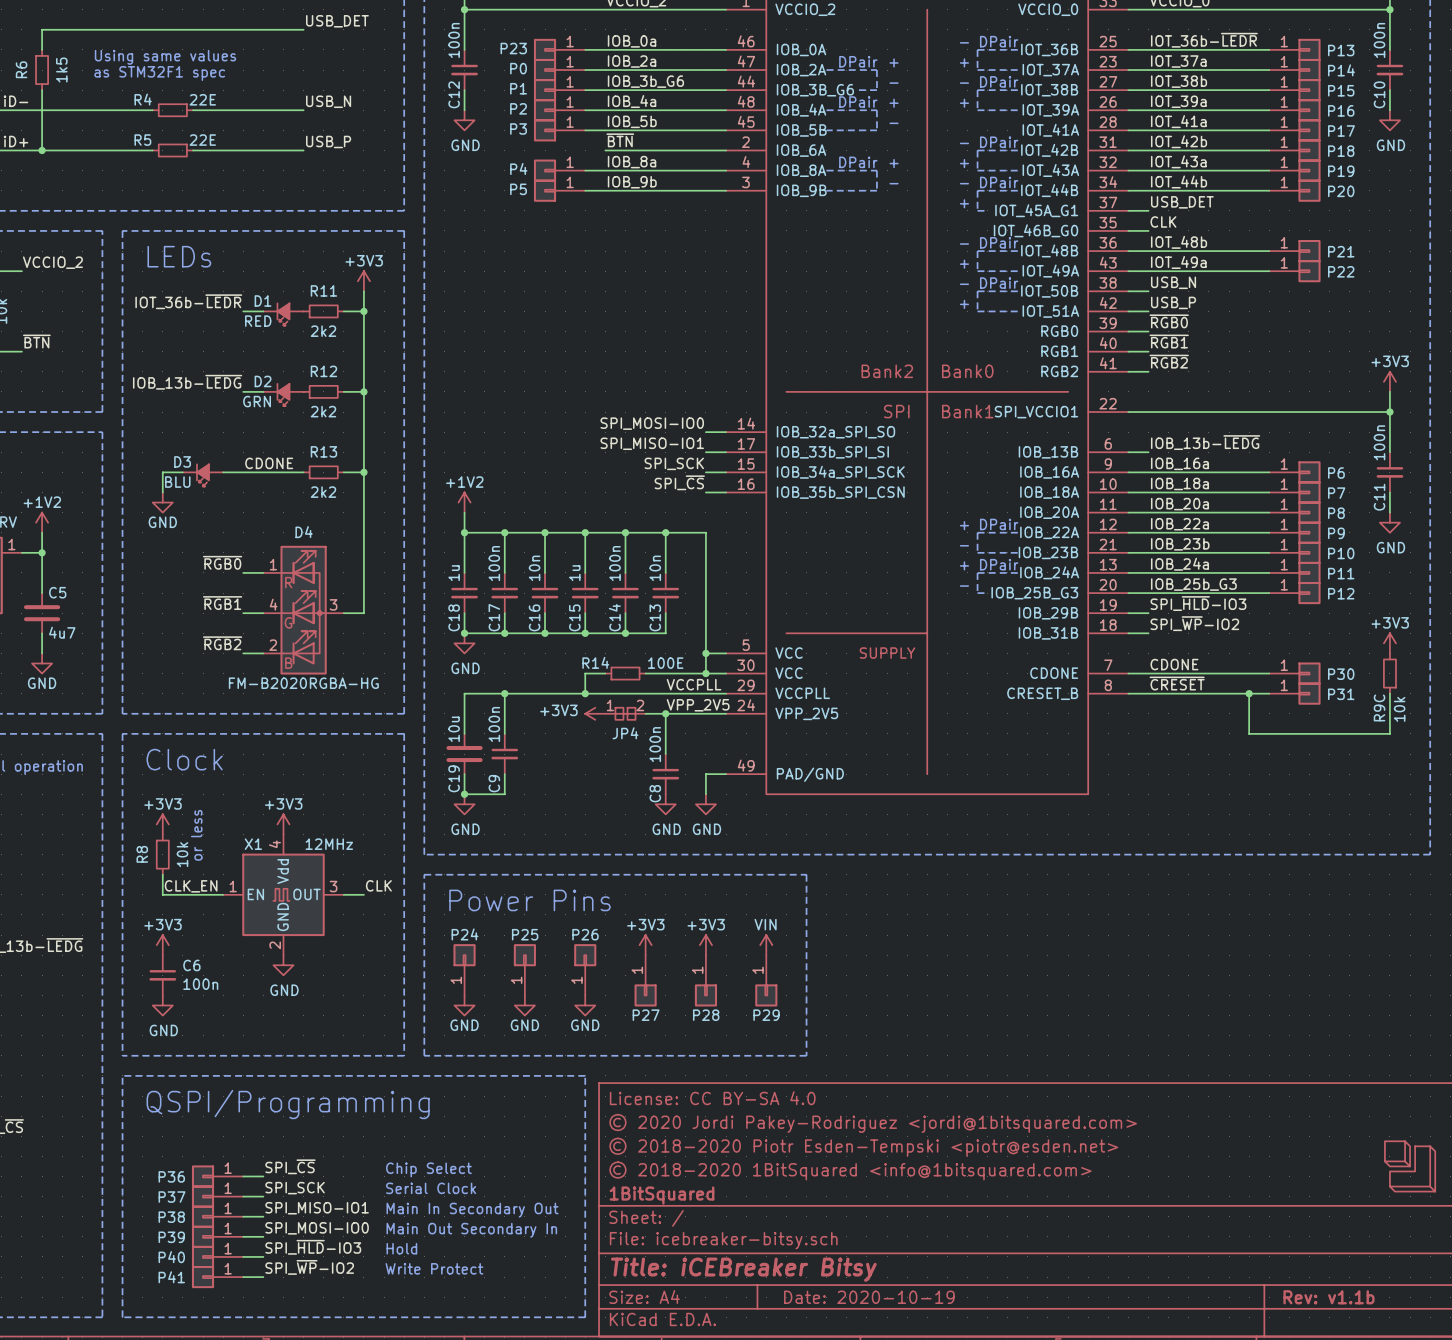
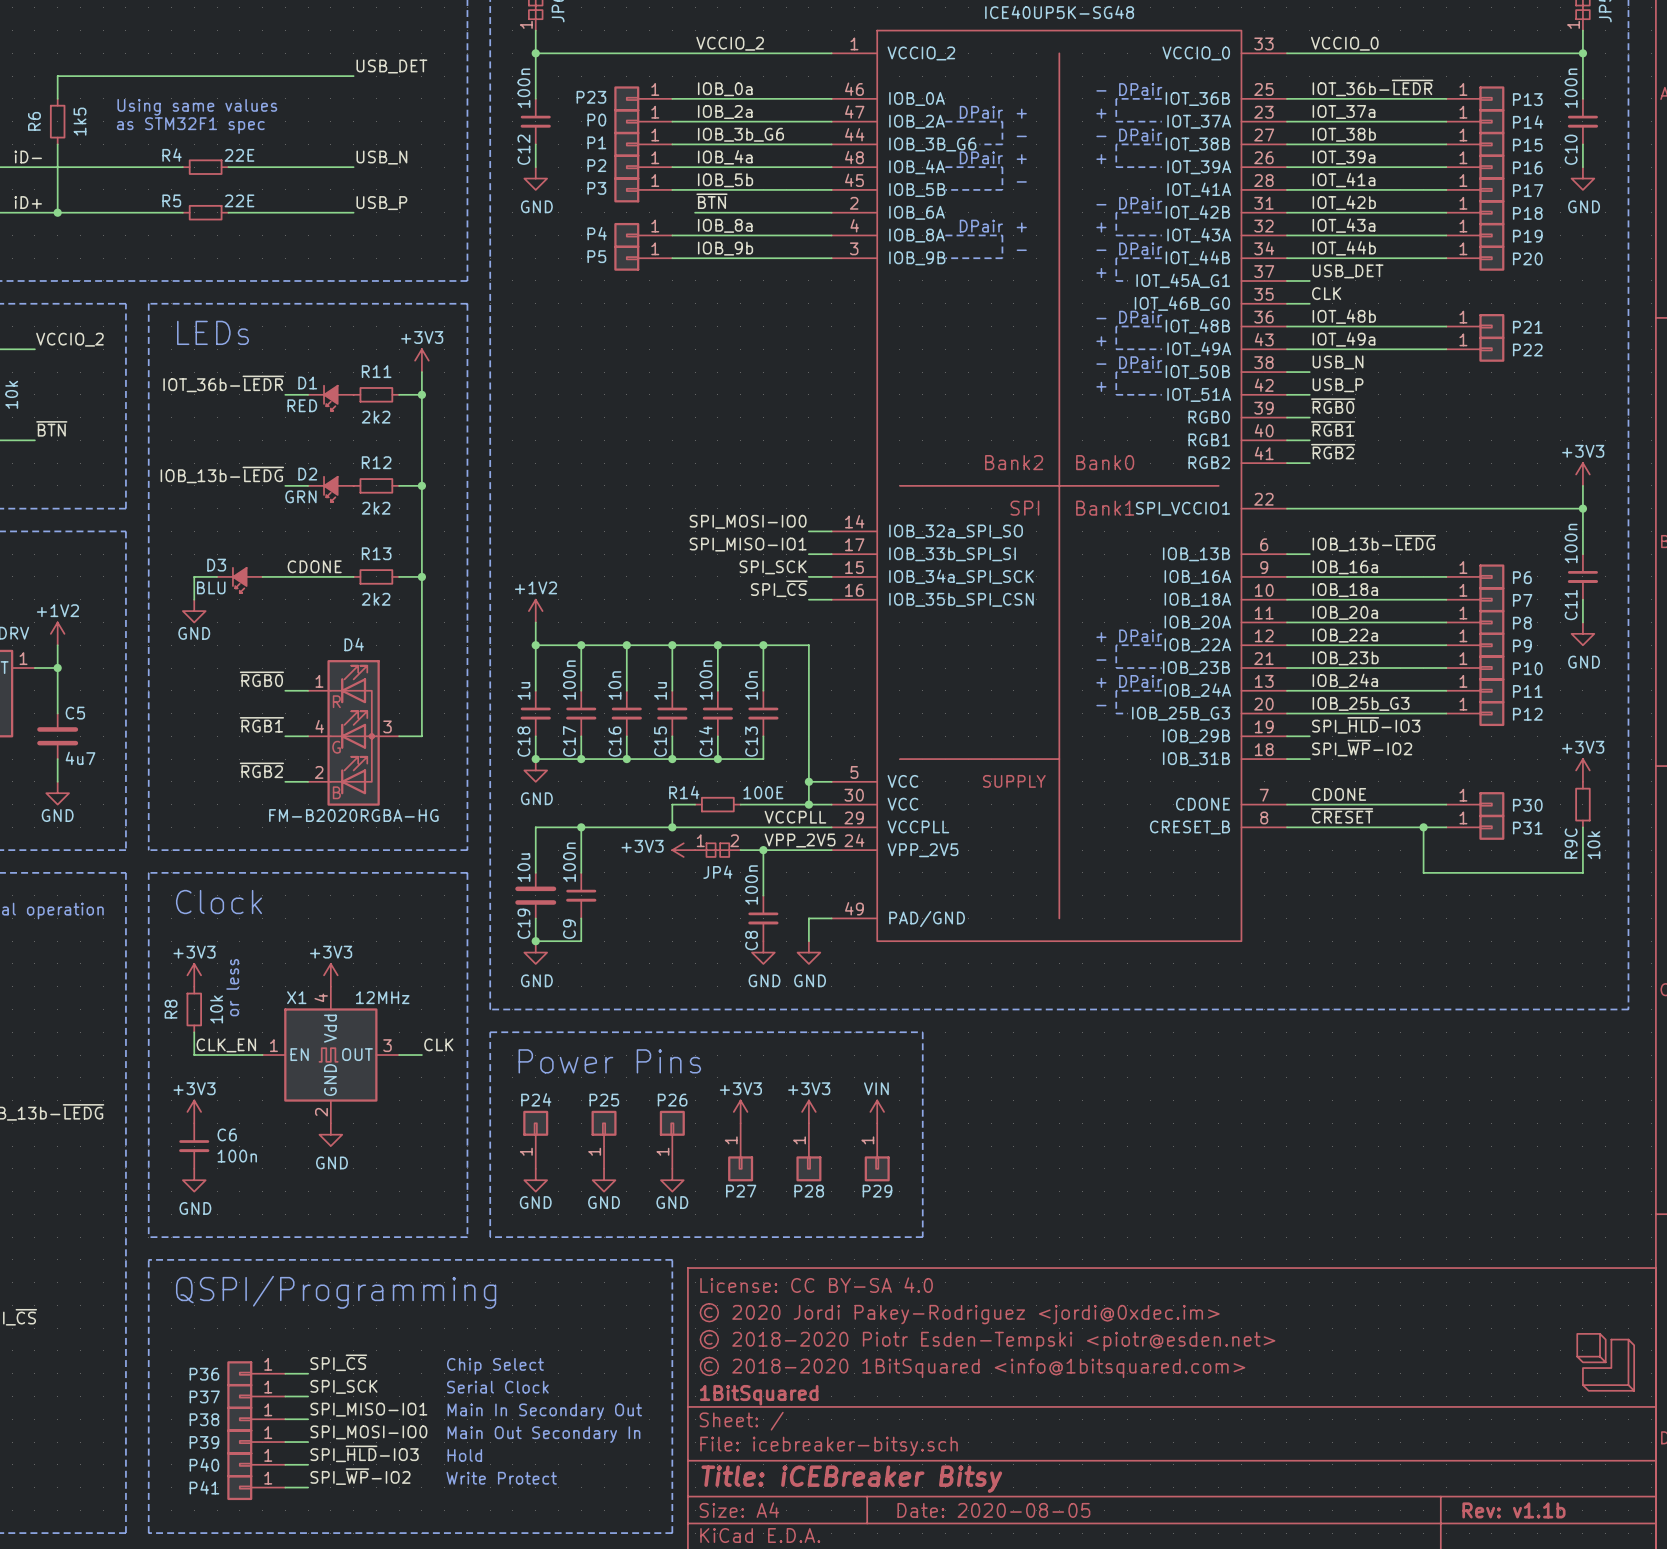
title block: © 2020 Jordi Pakey-Rodriguez <jordi@1bitsquared.com> (873, 1123) -> © 2020 Jordi Pakey-Rodriguez <jordi@0xdec.im> (959, 1313)
title block: Date: 2020-10-19 (869, 1297) -> Date: 2020-08-05 (993, 1510)

